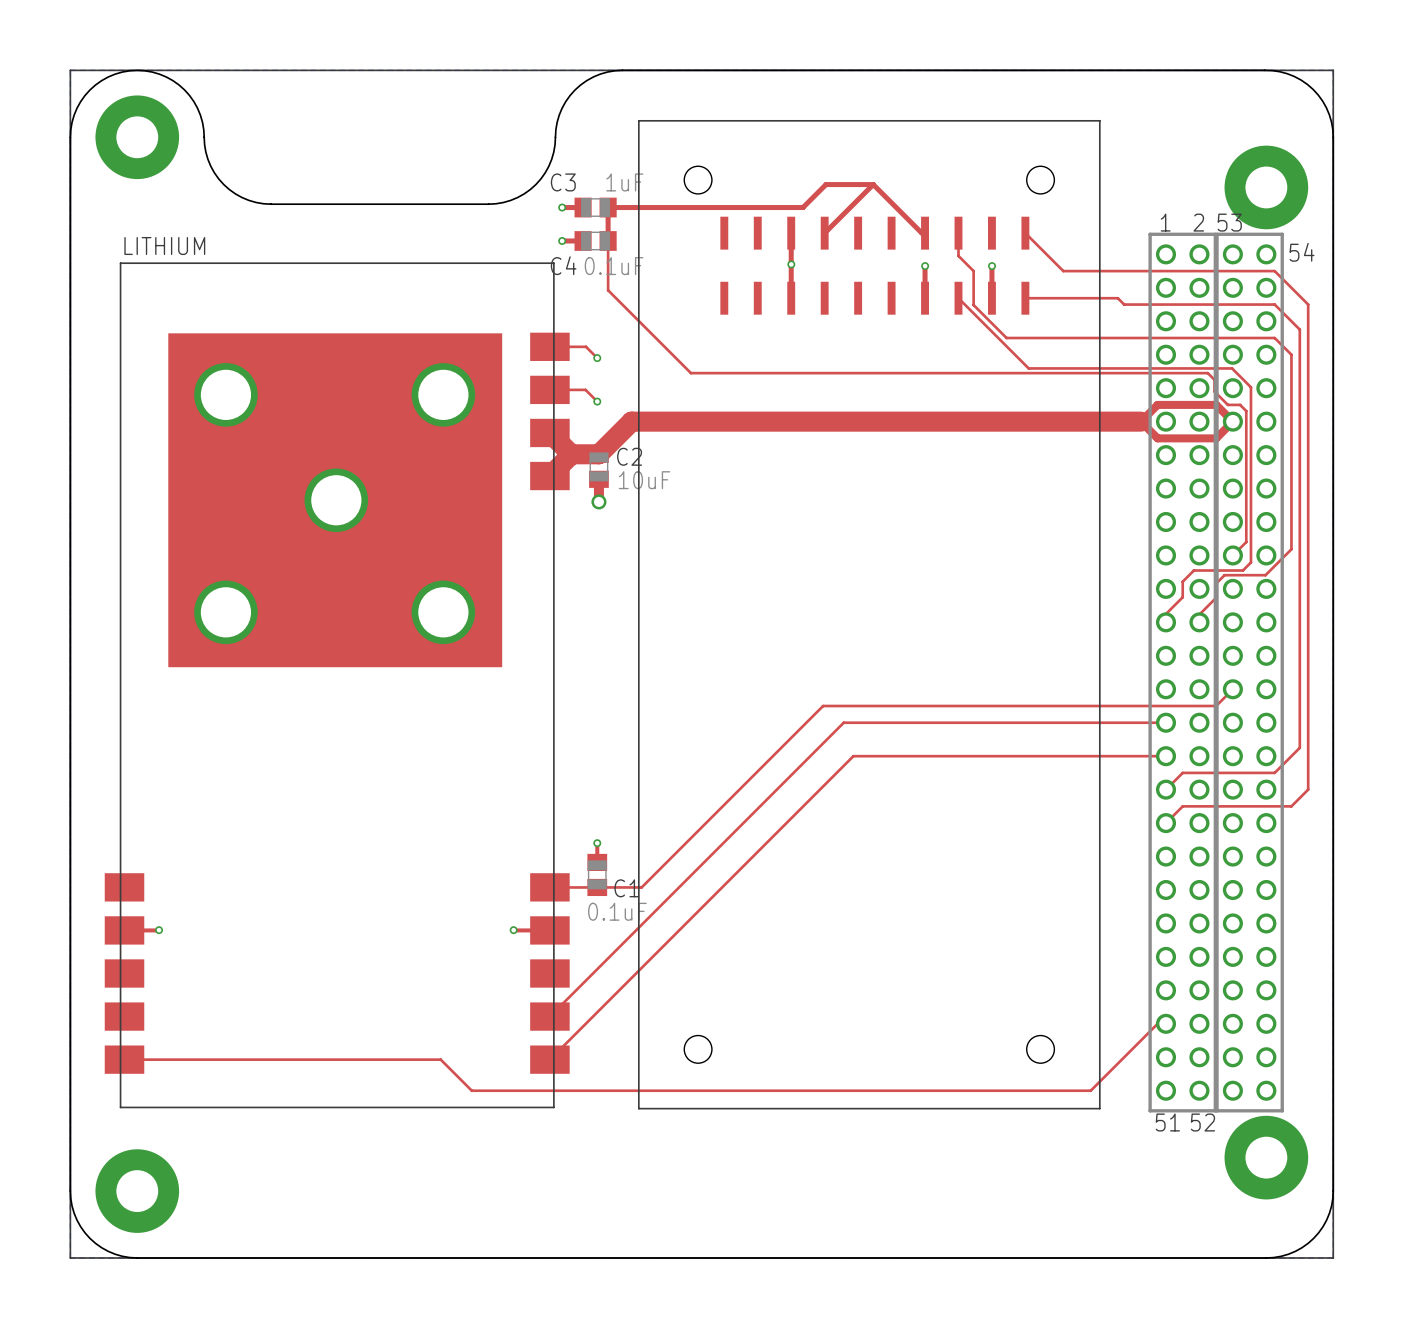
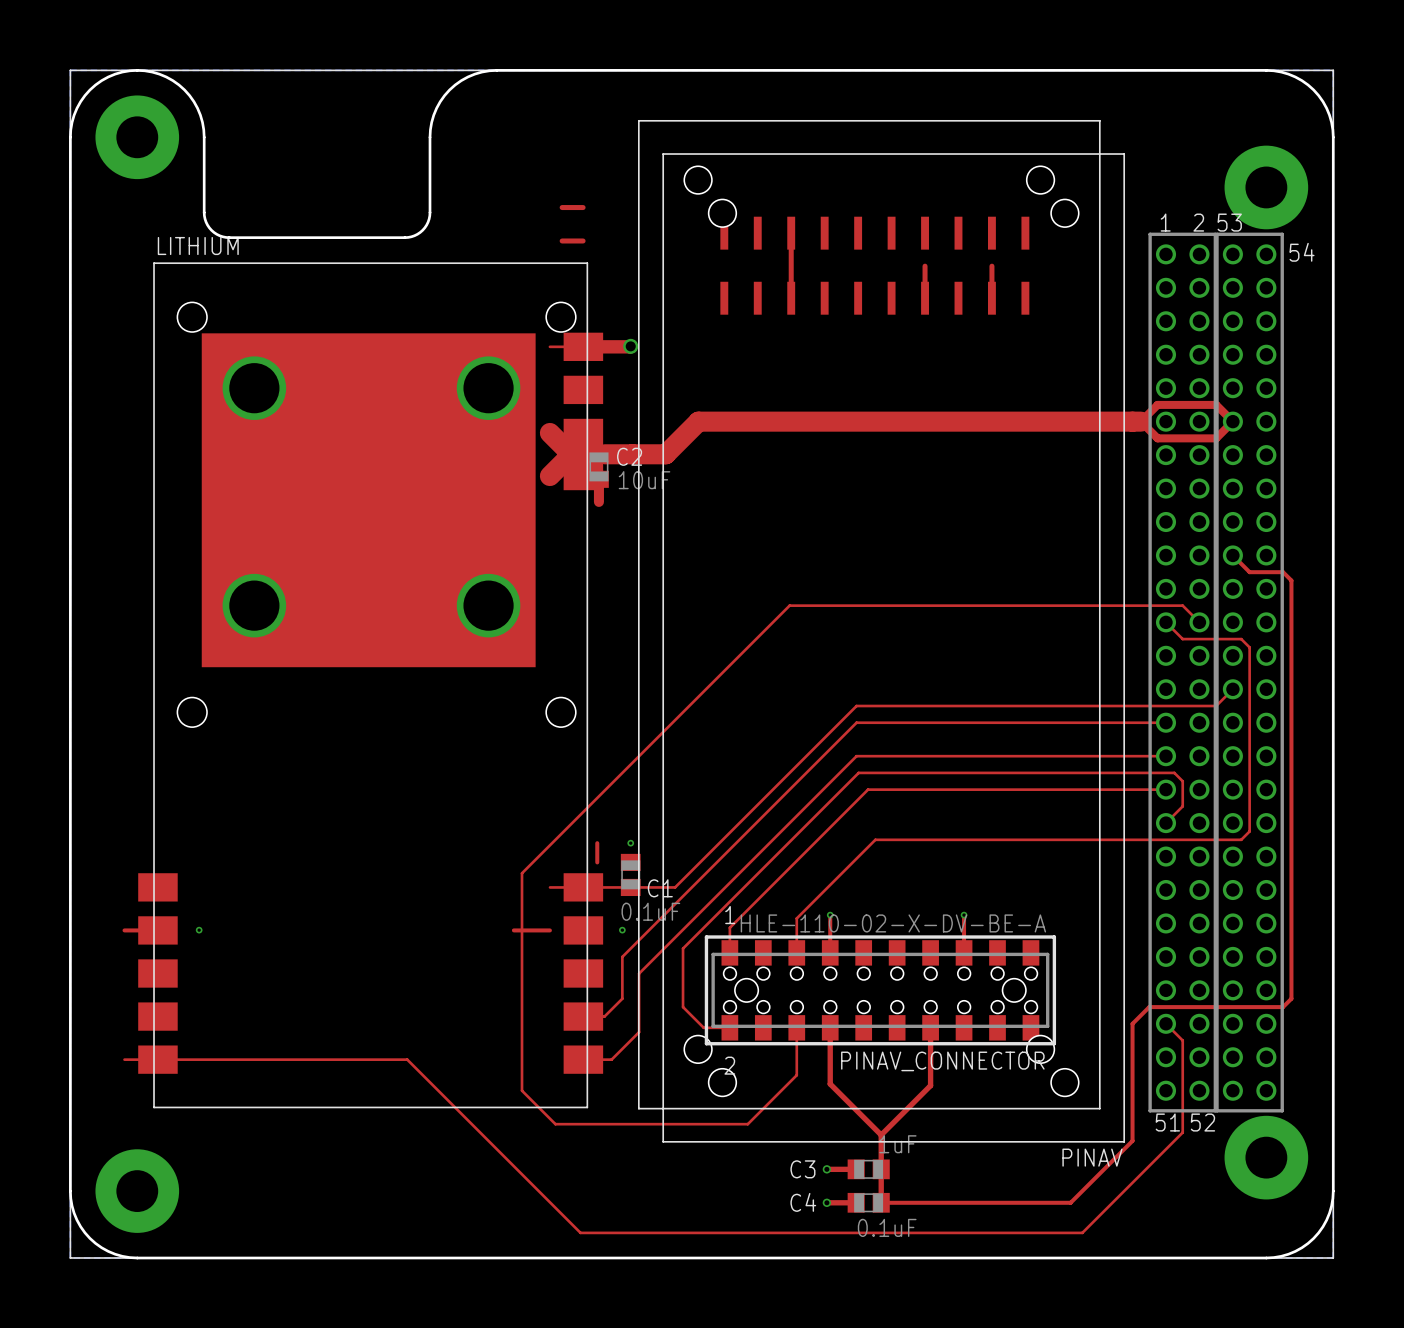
part footprint: [69, 69, 1335, 1259] -> [69, 69, 1335, 1259]
board edge: none -> (137, 70) (122, 72) (108, 77) (89, 89) (77, 108) (72, 122) (70, 137) (70, 1191) (72, 1205) (77, 1220) (89, 1238) (108, 1251) (122, 1256) (137, 1257) (1266, 1257) (1281, 1256) (1295, 1251) (1313, 1238) (1326, 1220) (1331, 1205) (1333, 1191) (1333, 137) (1331, 122) (1326, 108) (1313, 89) (1295, 77) (1281, 72) (1266, 70) (489, 70) (474, 74) (461, 80) (449, 89) (436, 108) (430, 129) (429, 215) (426, 225) (417, 234) (404, 237) (229, 237) (214, 232) (205, 219) (203, 129) (197, 108) (184, 89) (172, 80) (152, 72) (137, 70)
C3 name position: C3 (563, 182) -> C3 (802, 1169)
top track: (873, 184) (825, 184) (803, 207) (608, 207) (608, 290) (690, 373) (1207, 373) (1214, 379) (1214, 391) (1227, 404) (1240, 404) (1246, 411) (1246, 542) (1232, 555) -> (881, 1135) (881, 1202) (1070, 1202) (1132, 1140) (1132, 1023) (1149, 1007) (1283, 1007) (1291, 998) (1291, 580) (1283, 572) (1249, 572) (1232, 555)
top track: (873, 184) (824, 233) -> none
top track: (873, 184) (921, 233) (925, 233) -> none
via: (562, 207) -> none
C3 position: (595, 207) -> (868, 1169)
top track: (958, 233) (958, 255) (973, 271) (973, 305) (1006, 338) (1274, 338) (1291, 354) (1291, 549) (1265, 575) (1224, 575) (1216, 583) (1216, 597) (1199, 614) (1199, 622) -> (796, 1027) (796, 1075) (747, 1124) (555, 1124) (522, 1090) (522, 873) (789, 605) (1182, 605) (1199, 622)
top track: (1025, 233) (1063, 271) (1274, 271) (1308, 304) (1308, 789) (1291, 806) (1182, 806) -> (729, 1027) (703, 1027) (683, 1007) (683, 948) (858, 772) (1174, 772) (1182, 781) (1182, 806)
via: (562, 240) -> none
C4 position: (595, 240) -> (868, 1202)
via: (791, 264) -> none
C4 name position: C4 (563, 265) -> C4 (803, 1202)
via: (925, 266) -> none
via: (992, 266) -> none
top track: (958, 298) (1028, 368) (1232, 368) (1250, 387) (1250, 562) (1242, 570) (1193, 570) (1182, 581) (1182, 597) (1166, 614) (1166, 622) -> (796, 952) (796, 918) (875, 839) (1241, 839) (1249, 831) (1249, 647) (1241, 639) (1182, 639) (1166, 622)
top track: (1025, 298) (1117, 298) (1124, 304) (1274, 304) (1299, 329) (1299, 747) (1274, 772) (1182, 772) (1166, 789) -> (729, 952) (729, 927) (868, 789) (1166, 789)
top track: (586, 346) (597, 358) -> (586, 346) (630, 346)
via: none -> (630, 346)
via: (597, 358) -> none
top track: (549, 389) (585, 389) (597, 401) -> none
via: (225, 394) -> none
via: (443, 394) -> none
via: (597, 401) -> none
top track: (698, 421) (631, 421) (598, 454) -> (698, 421) (665, 454) (604, 454)
via: (336, 500) -> none
via: (598, 501) -> none
via: (225, 612) -> none
via: (443, 612) -> none
PINAV: none -> (893, 647)
LITHIUM: (337, 685) -> none
LITHIUM: none -> (370, 685)
top track: (856, 706) (823, 706) (641, 887) -> (856, 706) (675, 887) (641, 887)
top track: (856, 722) (843, 722) (549, 1016) -> (856, 722) (622, 956) (622, 998) (604, 1016) (583, 1016)
top track: (856, 756) (853, 756) (549, 1059) -> (856, 756) (639, 973) (639, 1032) (611, 1059) (583, 1059)
via: (597, 843) -> none
via: none -> (630, 843)
C1 position: (597, 874) -> (630, 874)
top track: none -> (830, 915) (830, 952)
via: none -> (830, 915)
top track: none -> (964, 915) (964, 952)
via: none -> (964, 915)
via: (159, 930) -> none
via: none -> (199, 930)
via: (513, 930) -> none
via: none -> (622, 930)
PINAV_CONNECTOR: none -> HLE-110-02-X-DV-BE-A (880, 990)
top track: (1166, 1023) (1157, 1023) (1090, 1090) (471, 1090) (440, 1059) (407, 1059) -> (1166, 1023) (1182, 1040) (1182, 1132) (1082, 1232) (580, 1232) (407, 1059)
top track: none -> (830, 1027) (830, 1084) (881, 1135)
top track: none -> (930, 1027) (930, 1085) (881, 1135)
top track: none -> (826, 1169) (856, 1169)
via: none -> (826, 1169)
top track: none -> (826, 1202) (856, 1202)
via: none -> (826, 1202)

